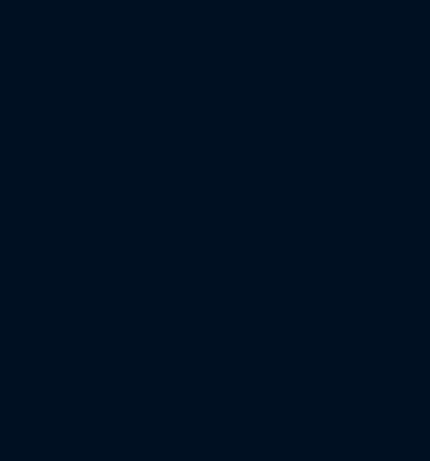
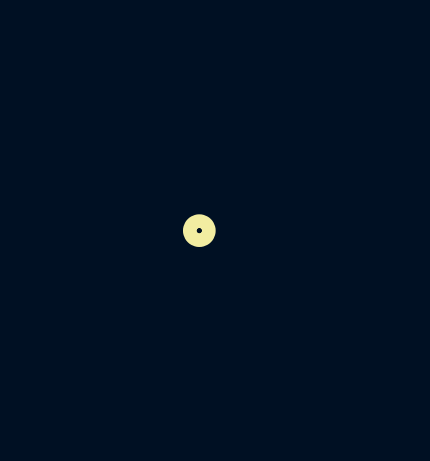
drawing: none -> [182, 214, 216, 247]

